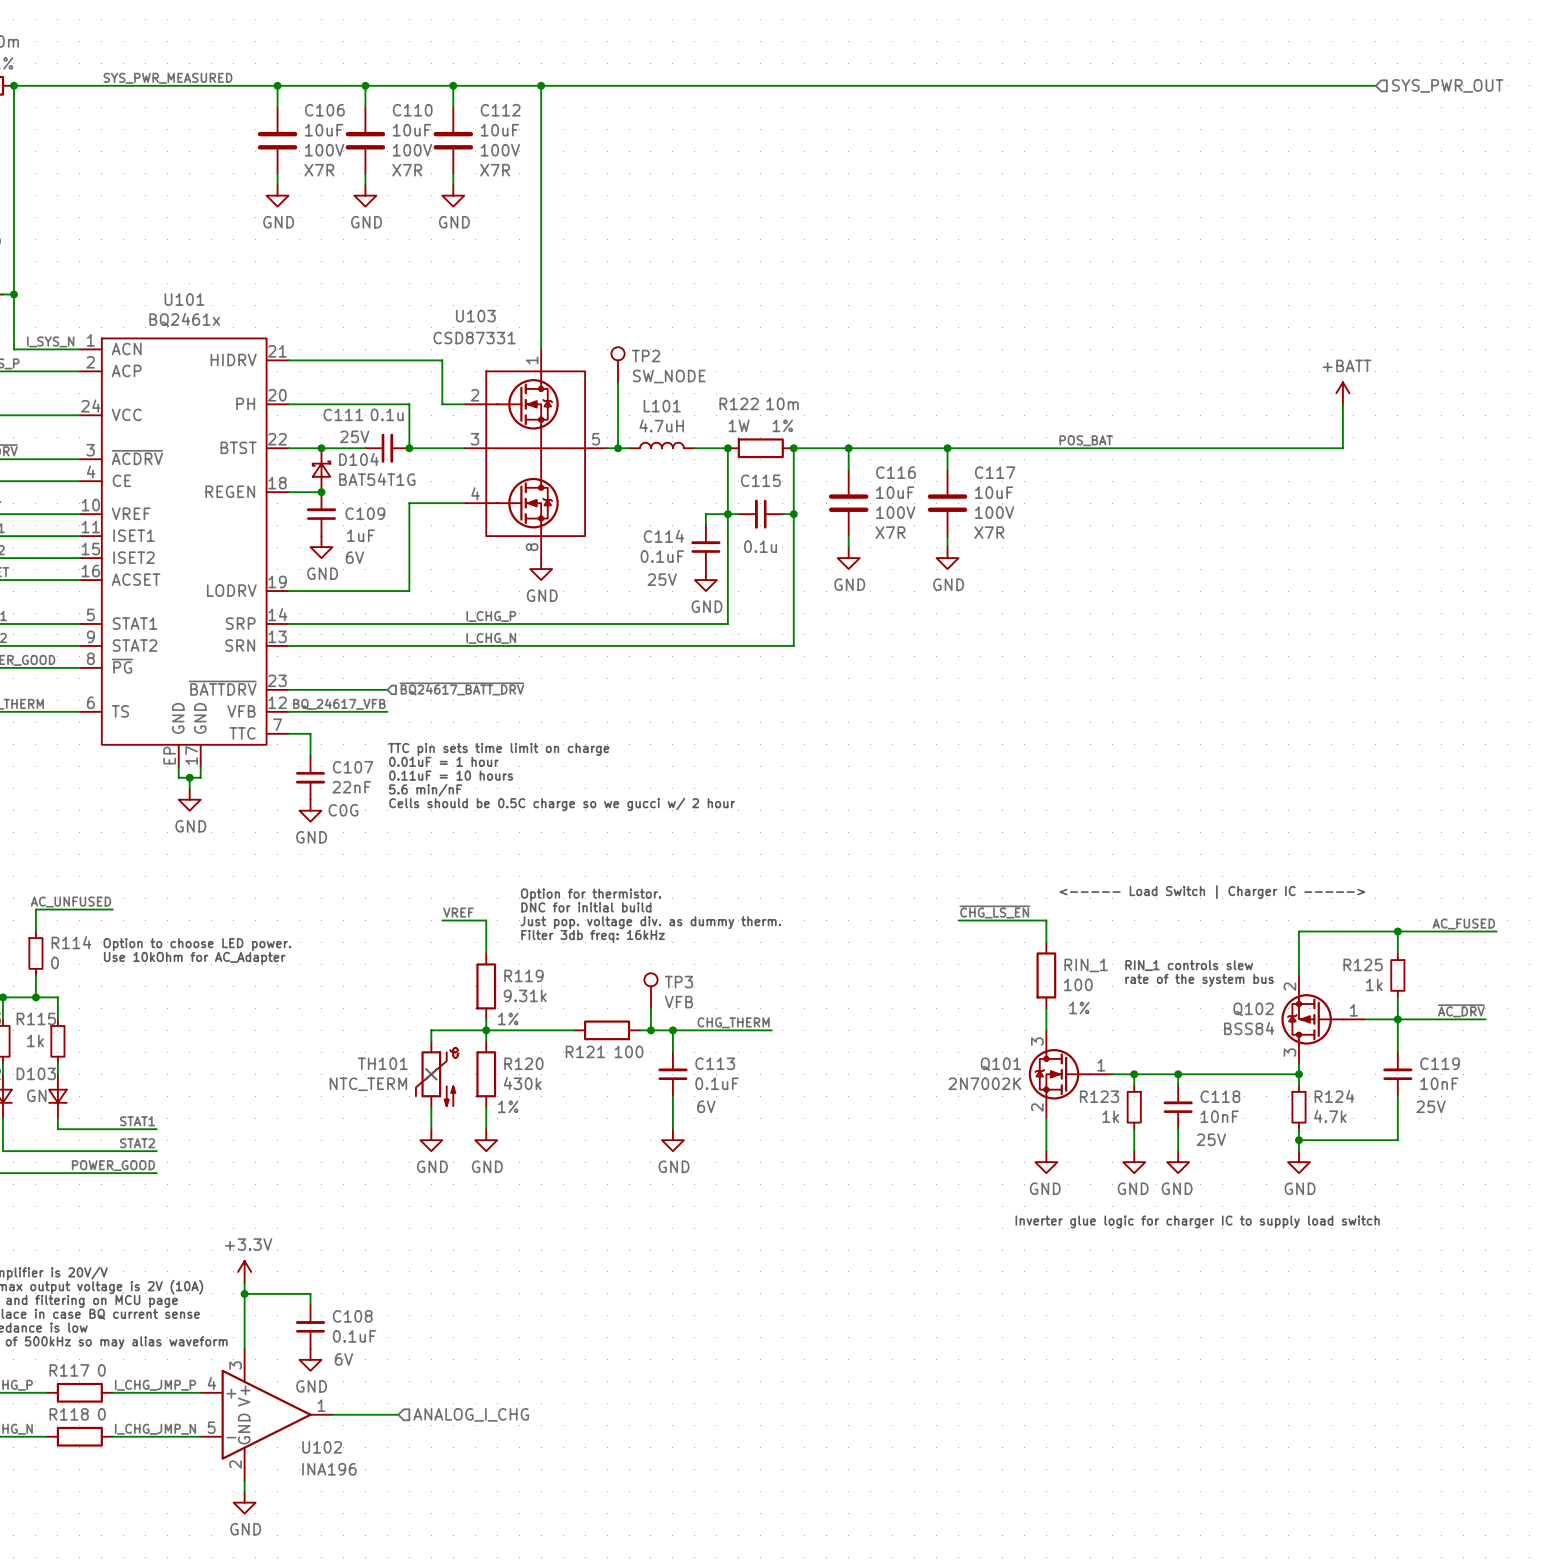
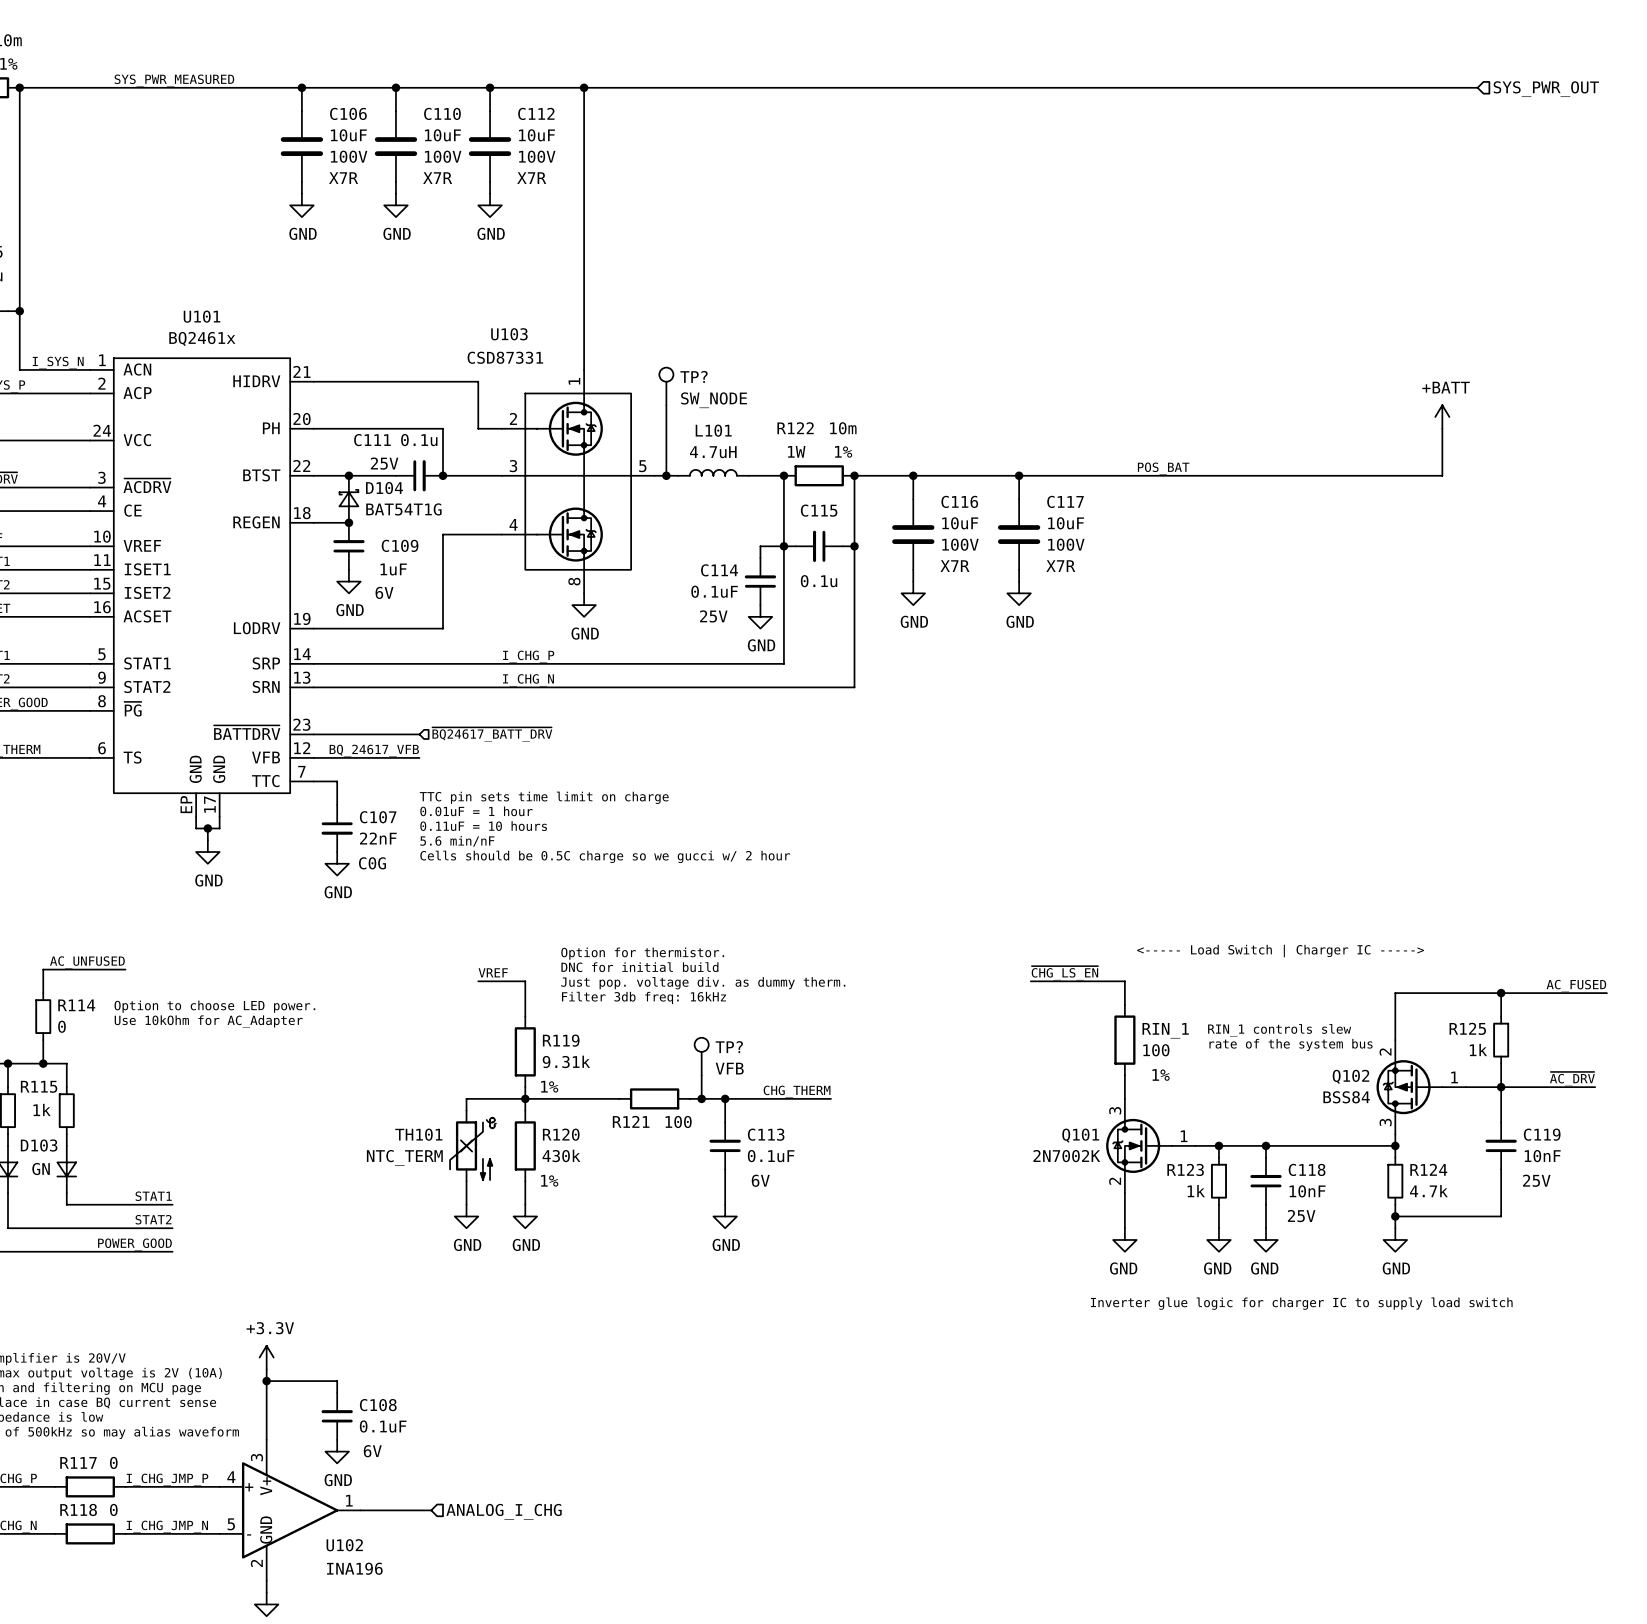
TP2 name: TP2 (646, 356) -> TP? (694, 376)
TP3 name: TP3 (678, 982) -> TP? (729, 1047)

